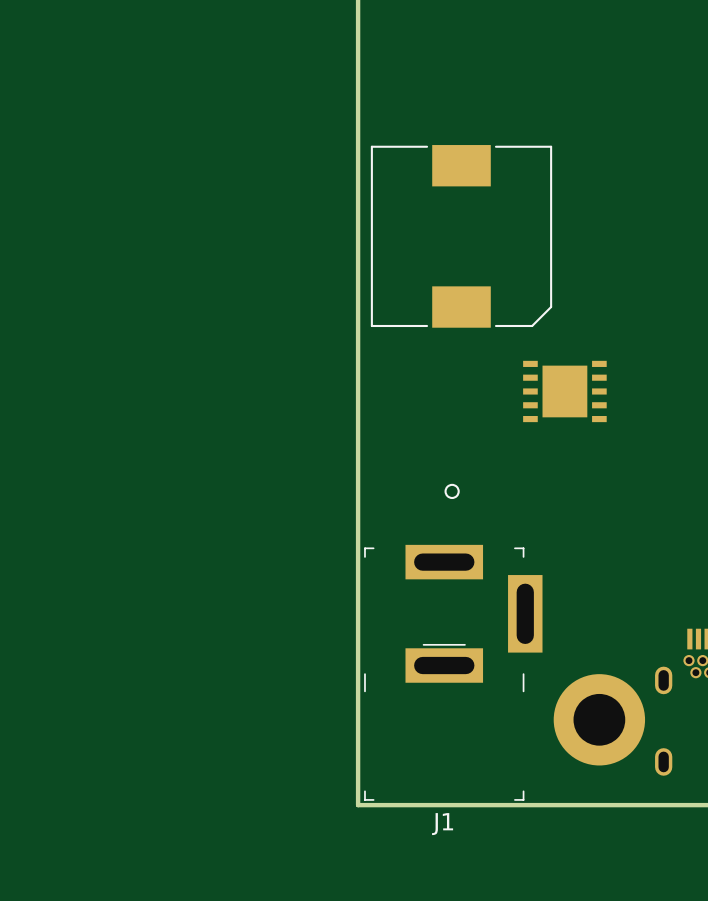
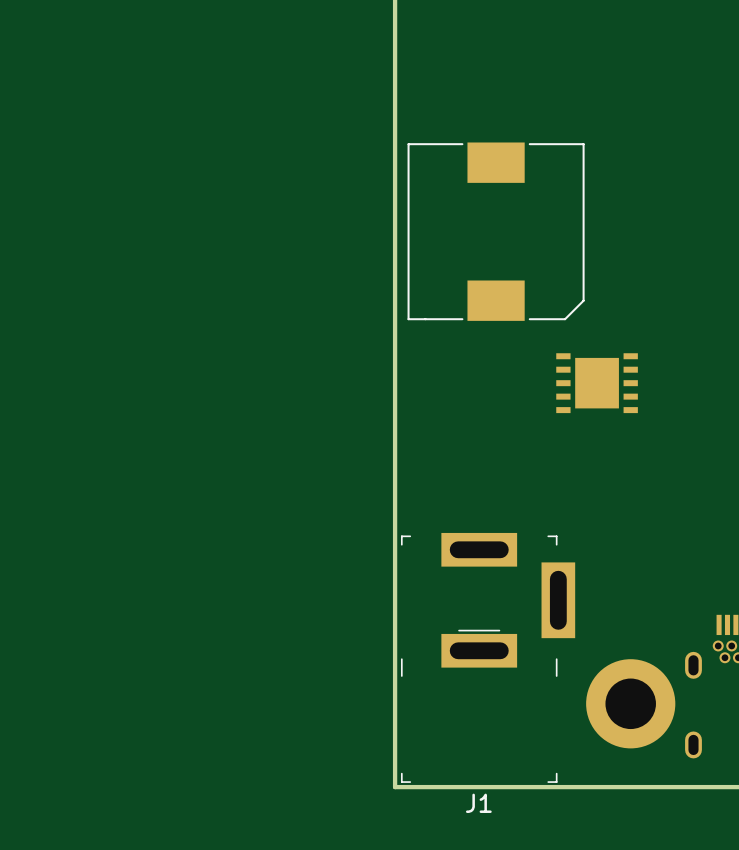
part: (452, 491) -> none

